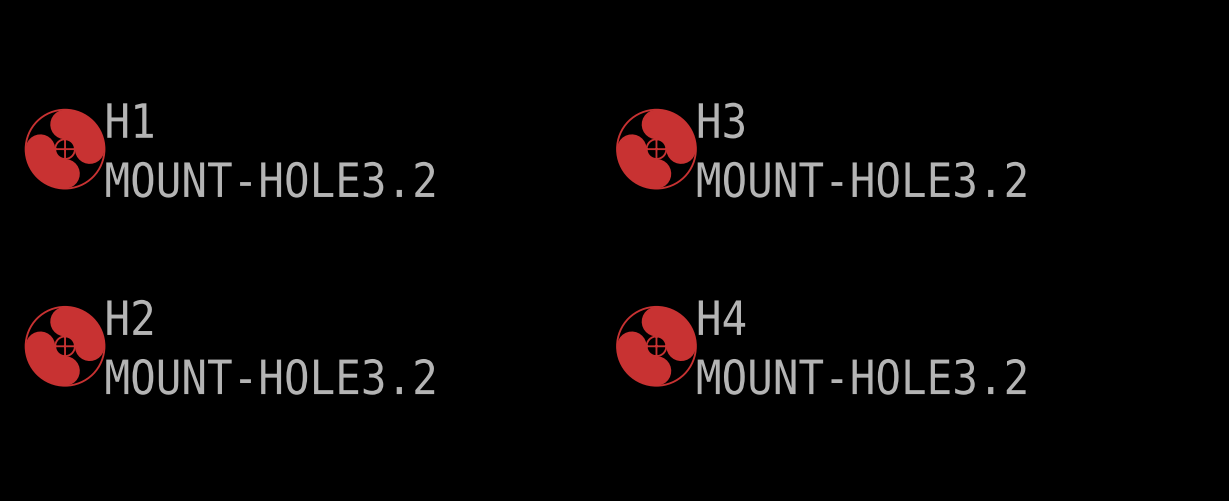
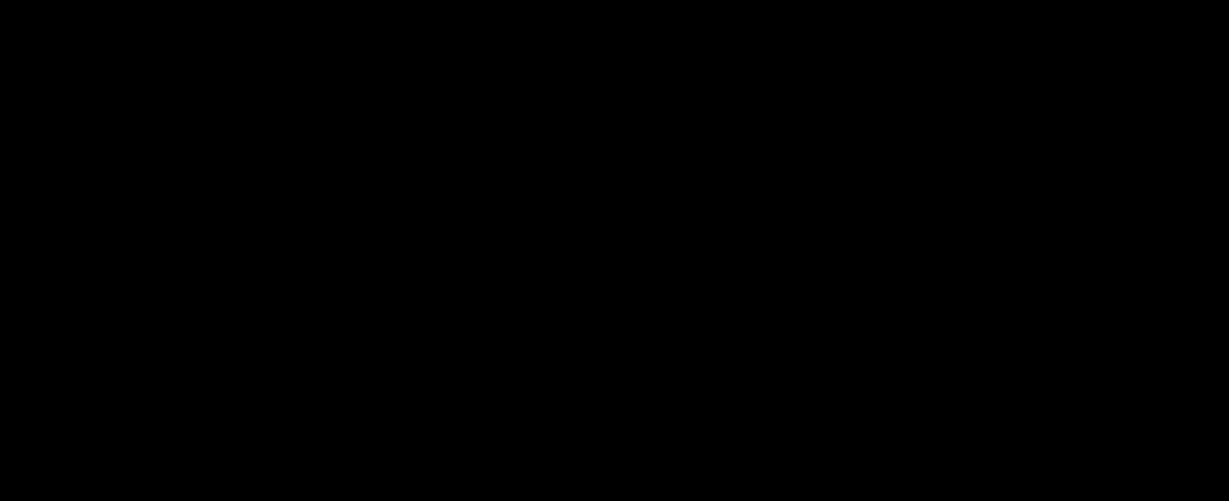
H1: MOUNT-HOLE3.2 (65, 149) -> none
H3: MOUNT-HOLE3.2 (656, 149) -> none
H2: MOUNT-HOLE3.2 (65, 346) -> none
H4: MOUNT-HOLE3.2 (656, 346) -> none

